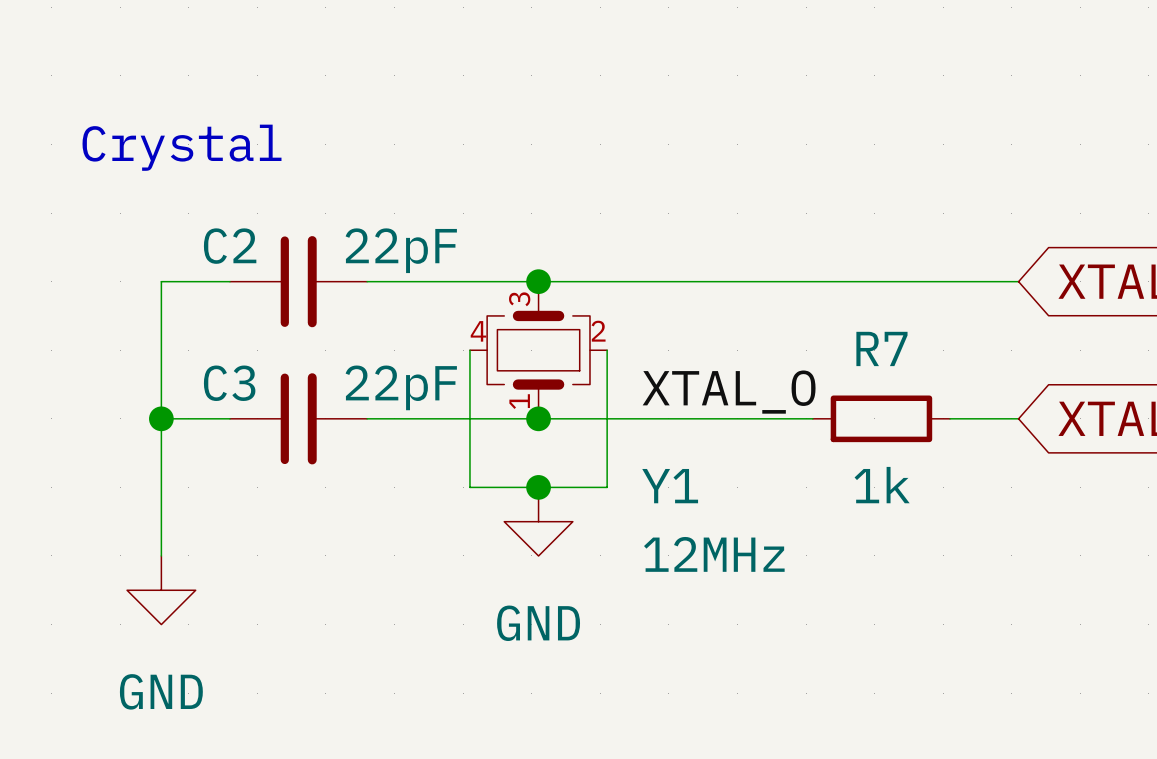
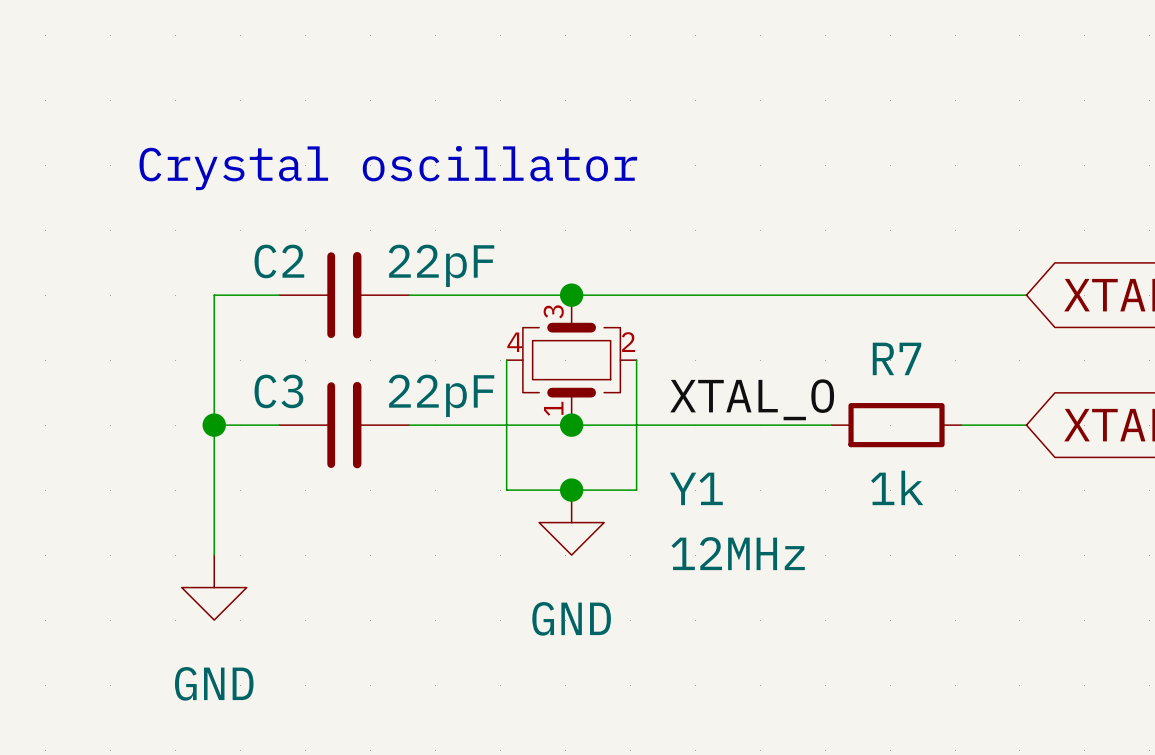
text: Crystal (182, 147) -> Crystal oscillator (388, 168)

